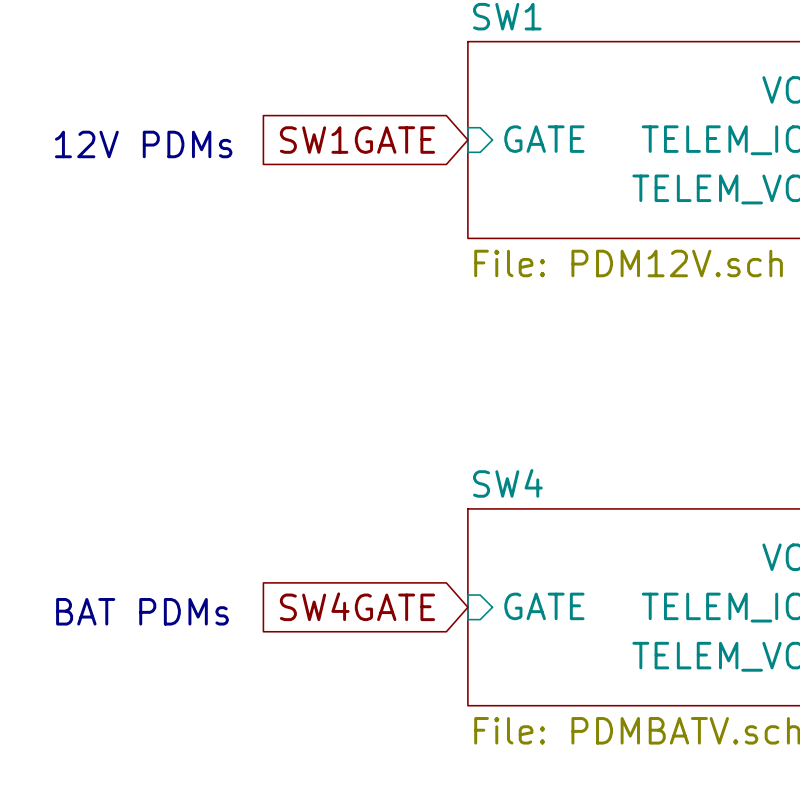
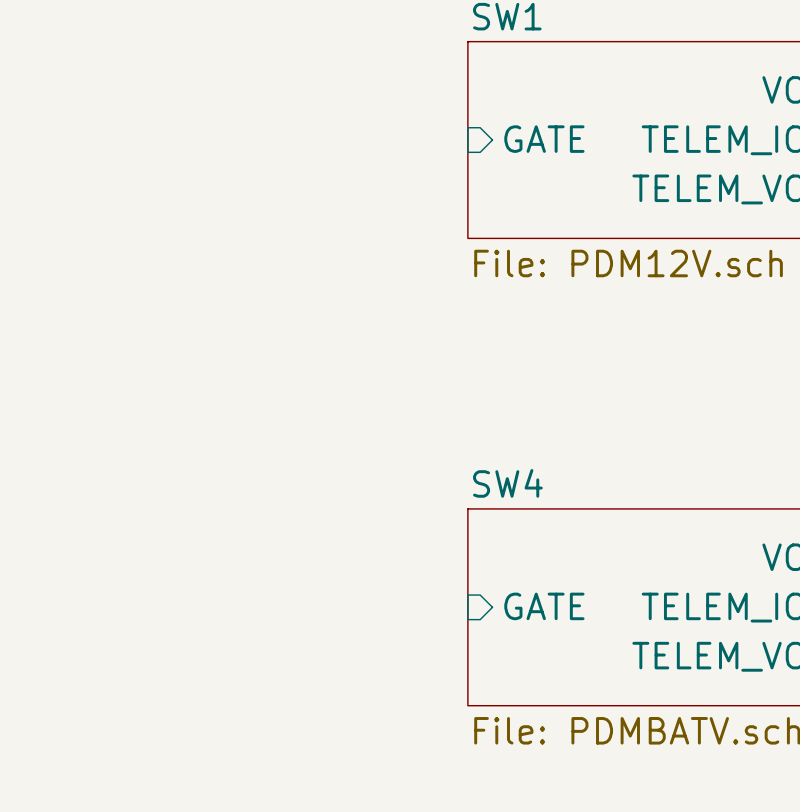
global label: SW1GATE (357, 140) -> none
text: 12V PDMs (143, 144) -> none
global label: SW4GATE (357, 606) -> none
text: BAT PDMs (142, 611) -> none

